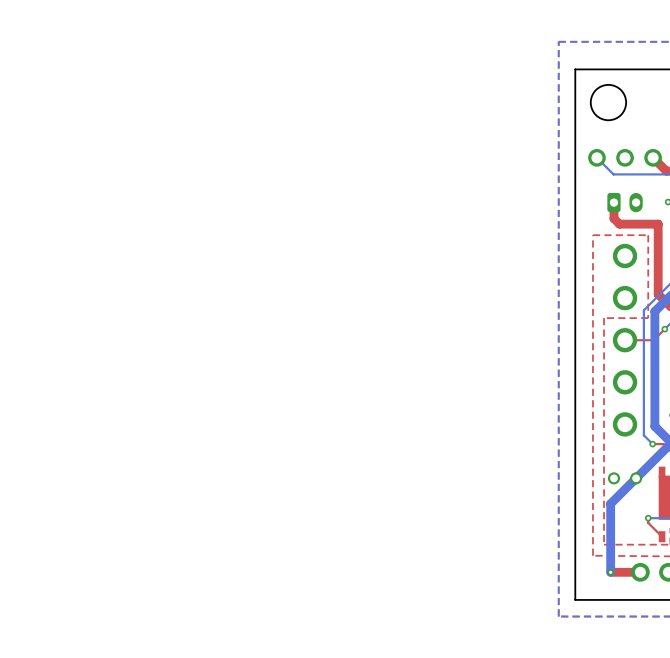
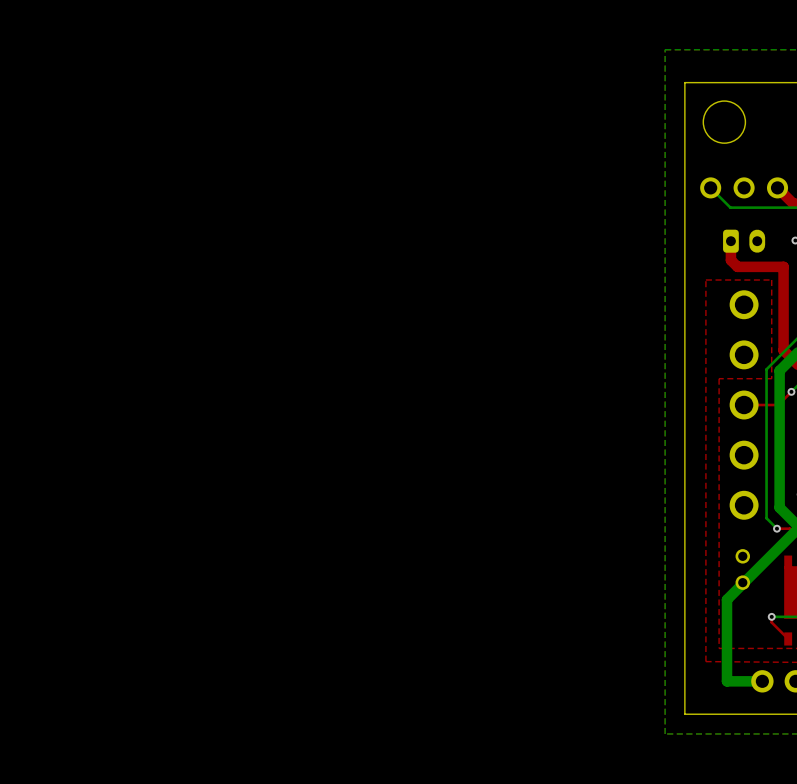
part rotation: 0° (625, 478) -> 90° clockwise (742, 569)
via: (610, 572) -> none
top track: (640, 572) (610, 572) -> none
bottom track: none -> (762, 681) (726, 681)

